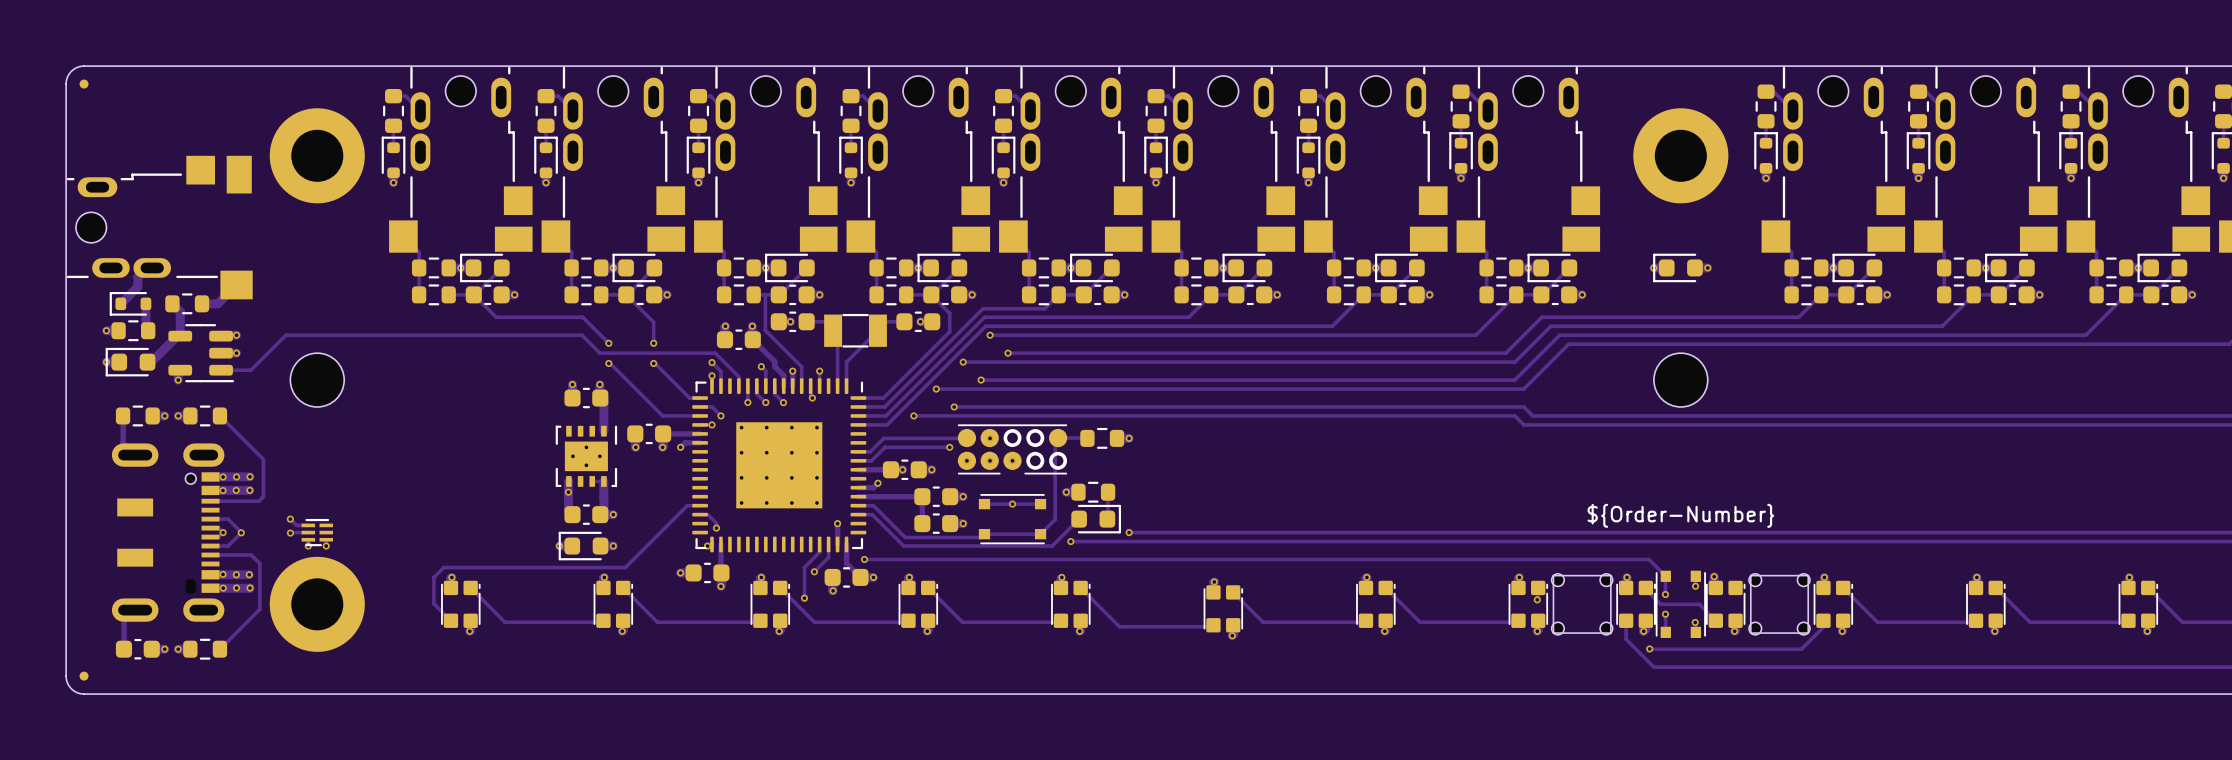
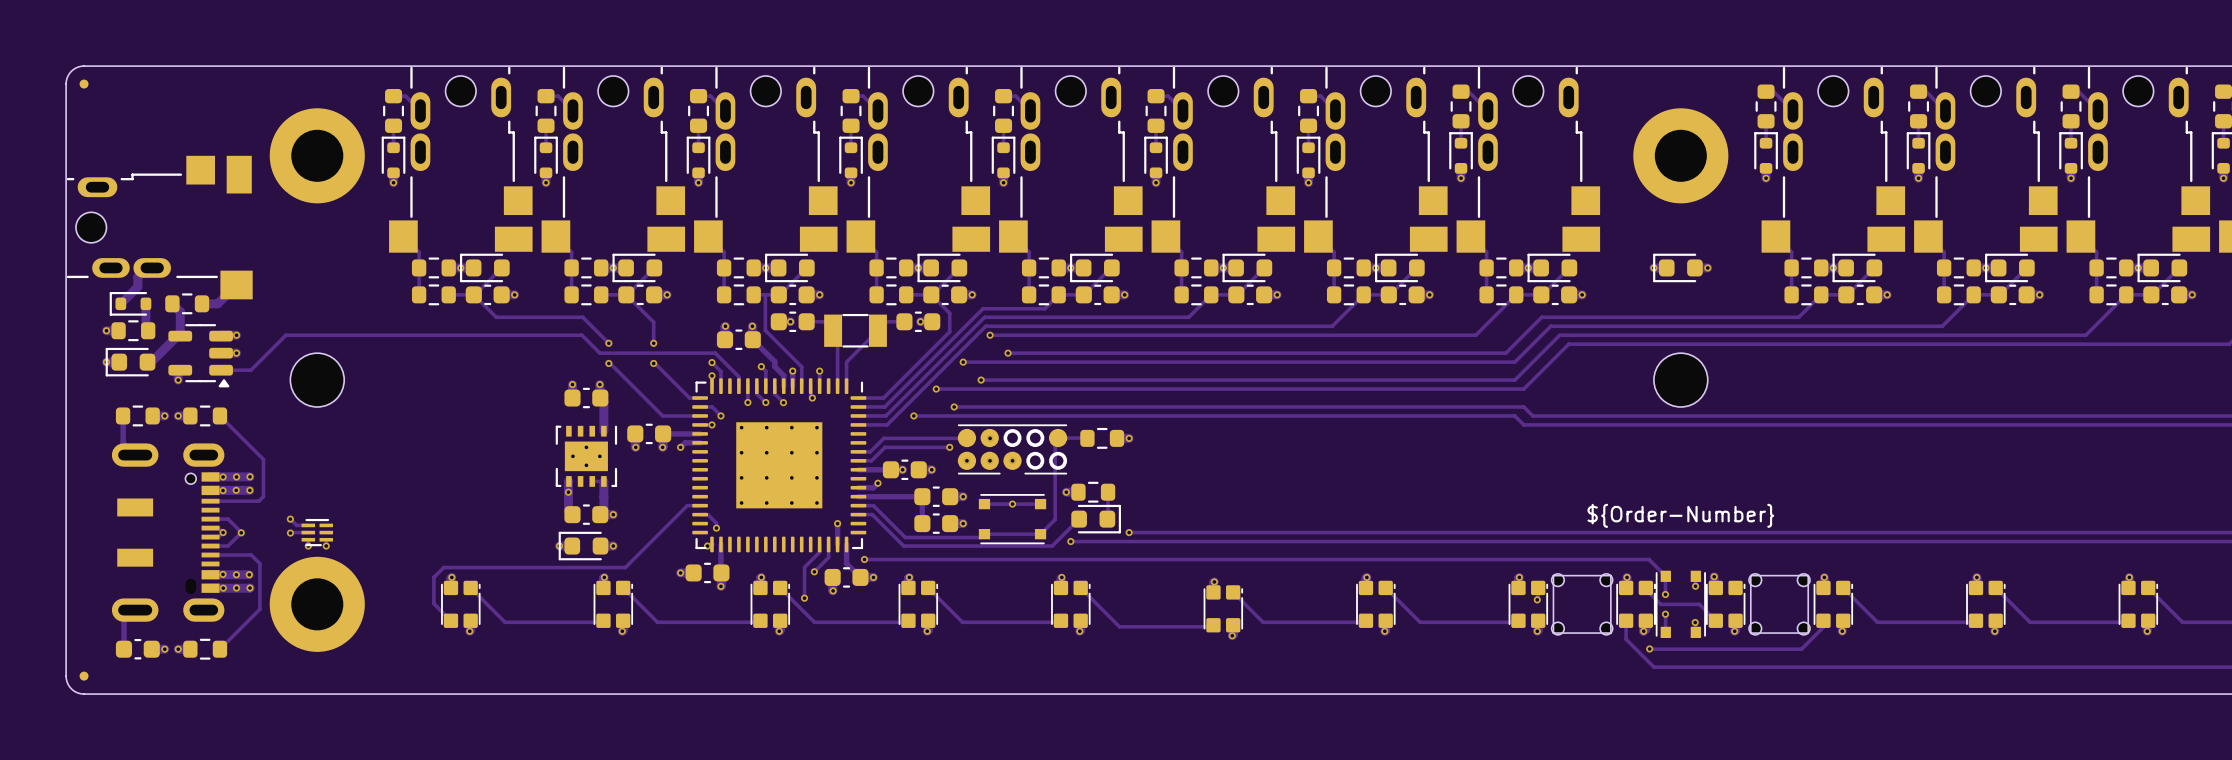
part footprint: [168, 324, 235, 383] -> [168, 324, 233, 388]

